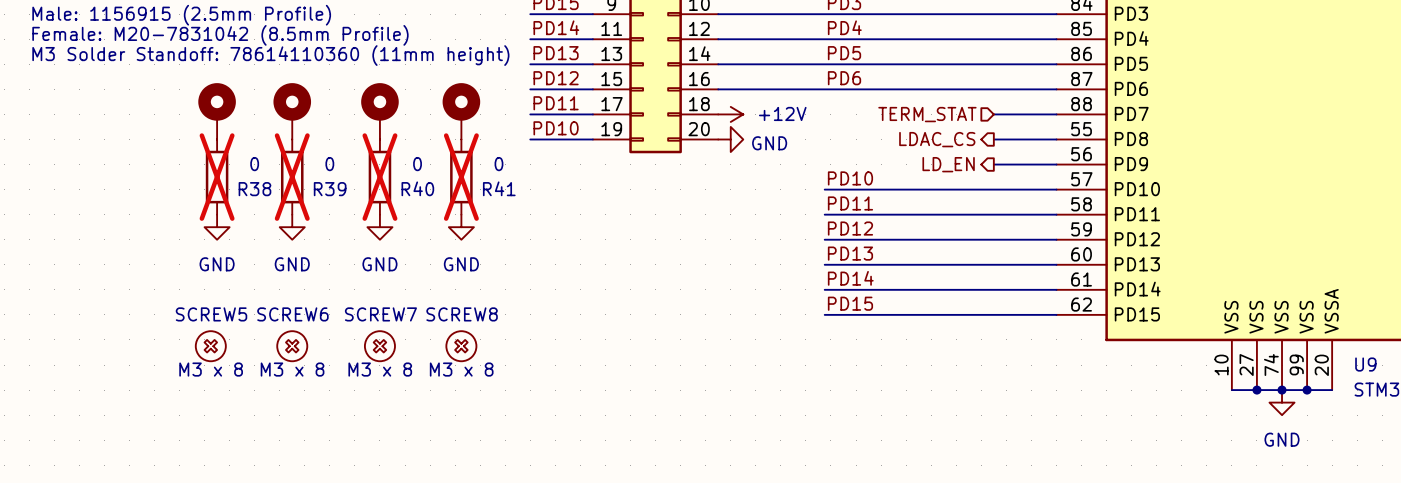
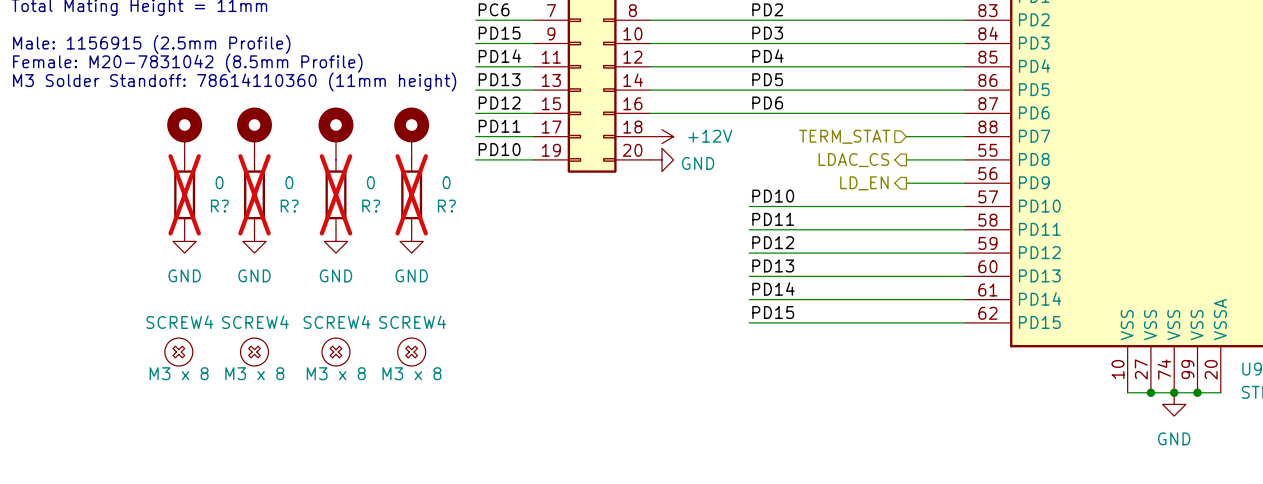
R40 name: R40 (417, 188) -> R? (371, 206)
R41 name: R41 (499, 188) -> R? (446, 206)
R38 name: R38 (254, 189) -> R? (219, 206)
R39 name: R39 (330, 189) -> R? (289, 206)
SCREW5 name: SCREW5 (211, 314) -> SCREW4 (179, 322)
SCREW6 name: SCREW6 (292, 314) -> SCREW4 (255, 322)
SCREW7 name: SCREW7 (380, 314) -> SCREW4 (336, 322)
SCREW8 name: SCREW8 (462, 314) -> SCREW4 (412, 322)

